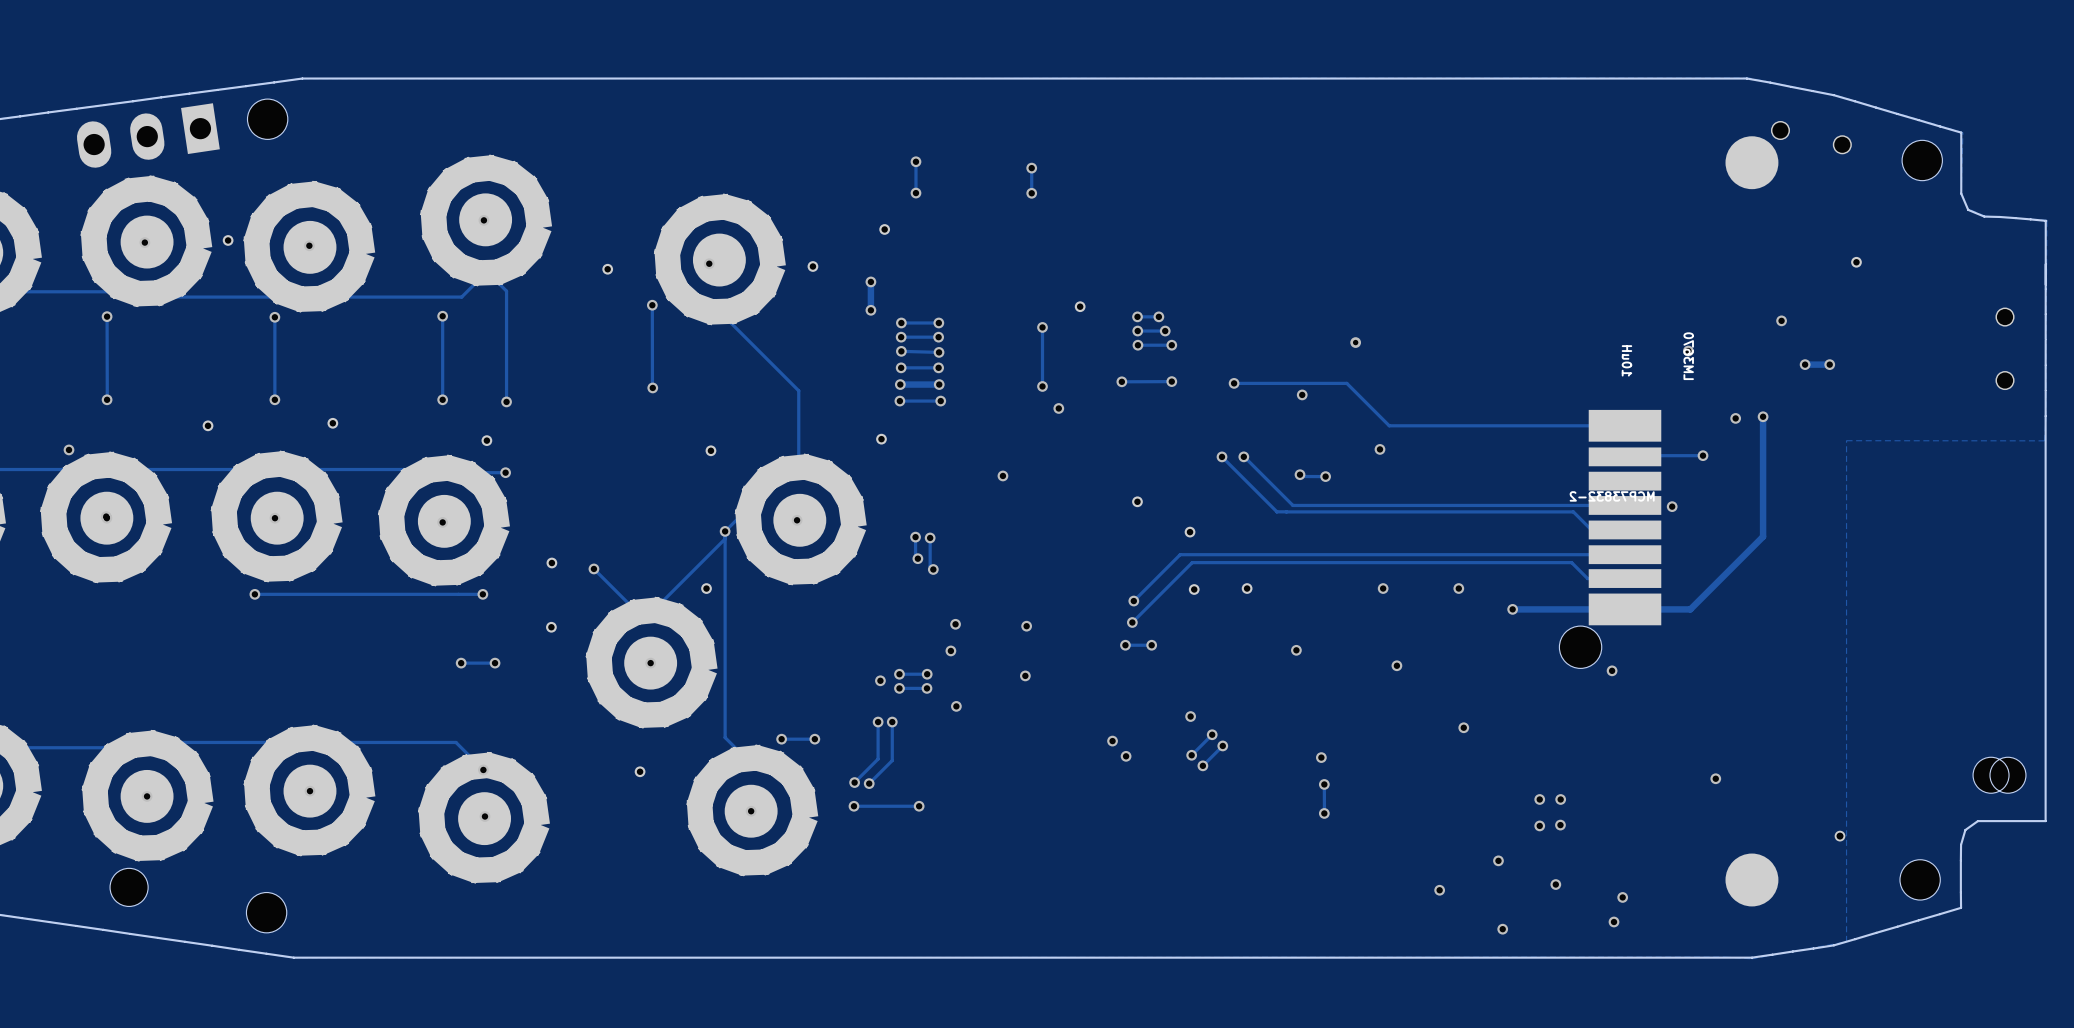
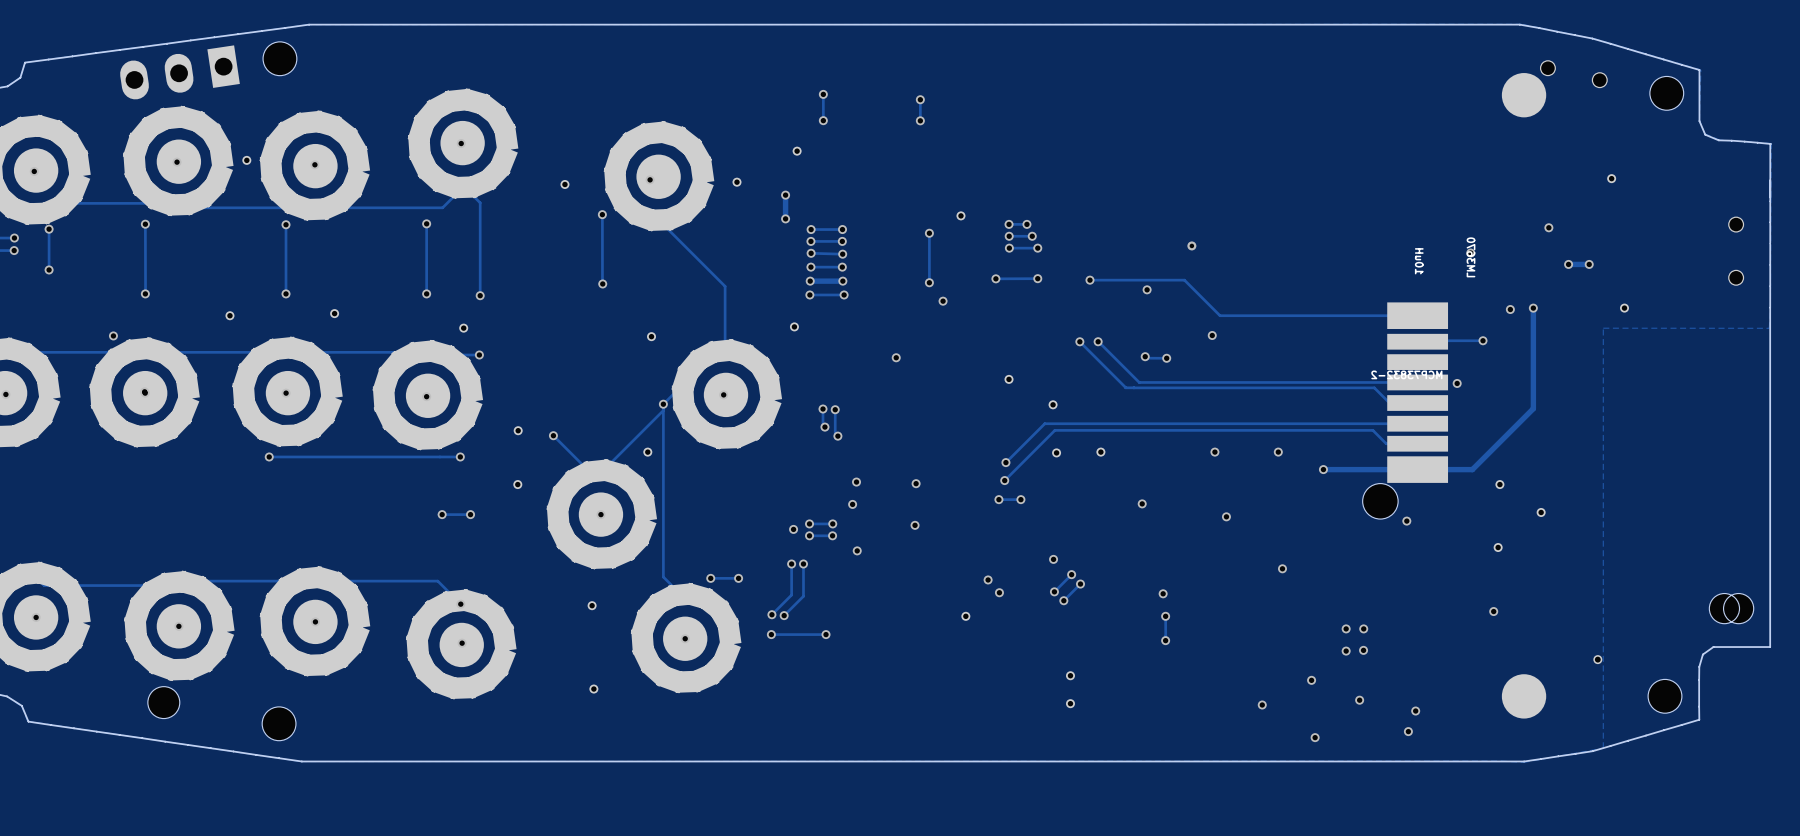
part: none -> (1624, 308)
part: none -> (1499, 484)
part: none -> (1541, 512)
part: none -> (1498, 547)
part: none -> (965, 616)
part: none -> (1070, 675)
part: none -> (593, 689)
part: none -> (1070, 703)

